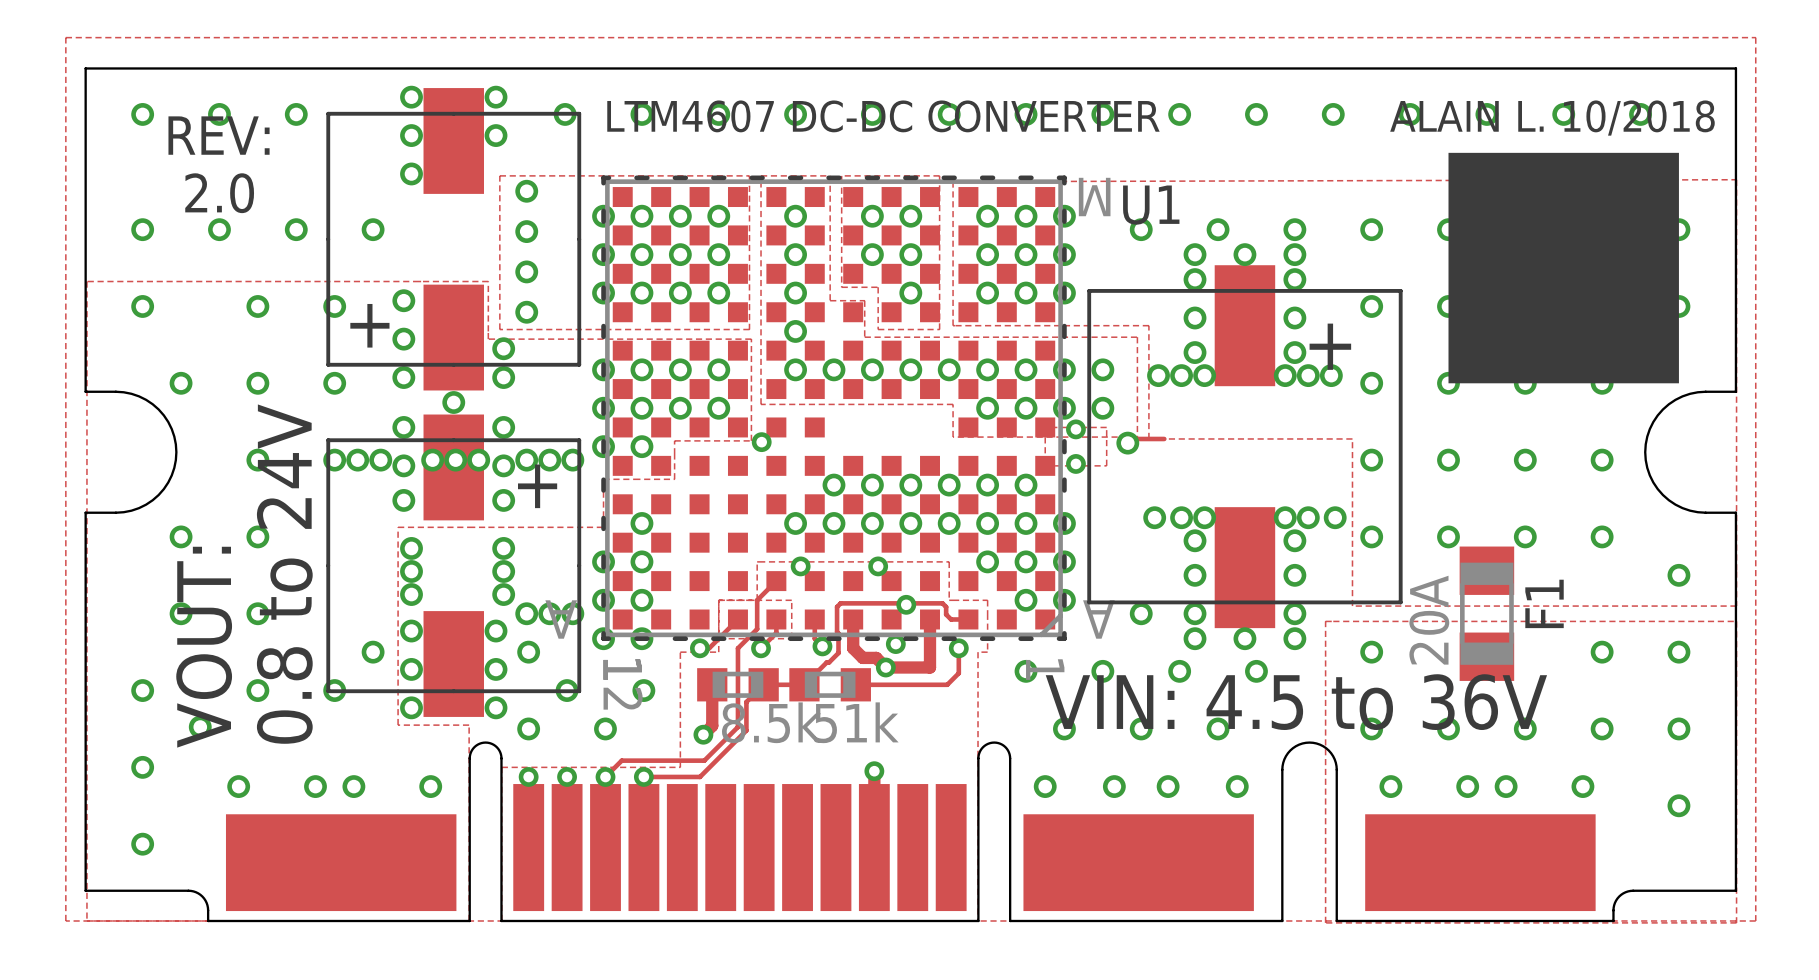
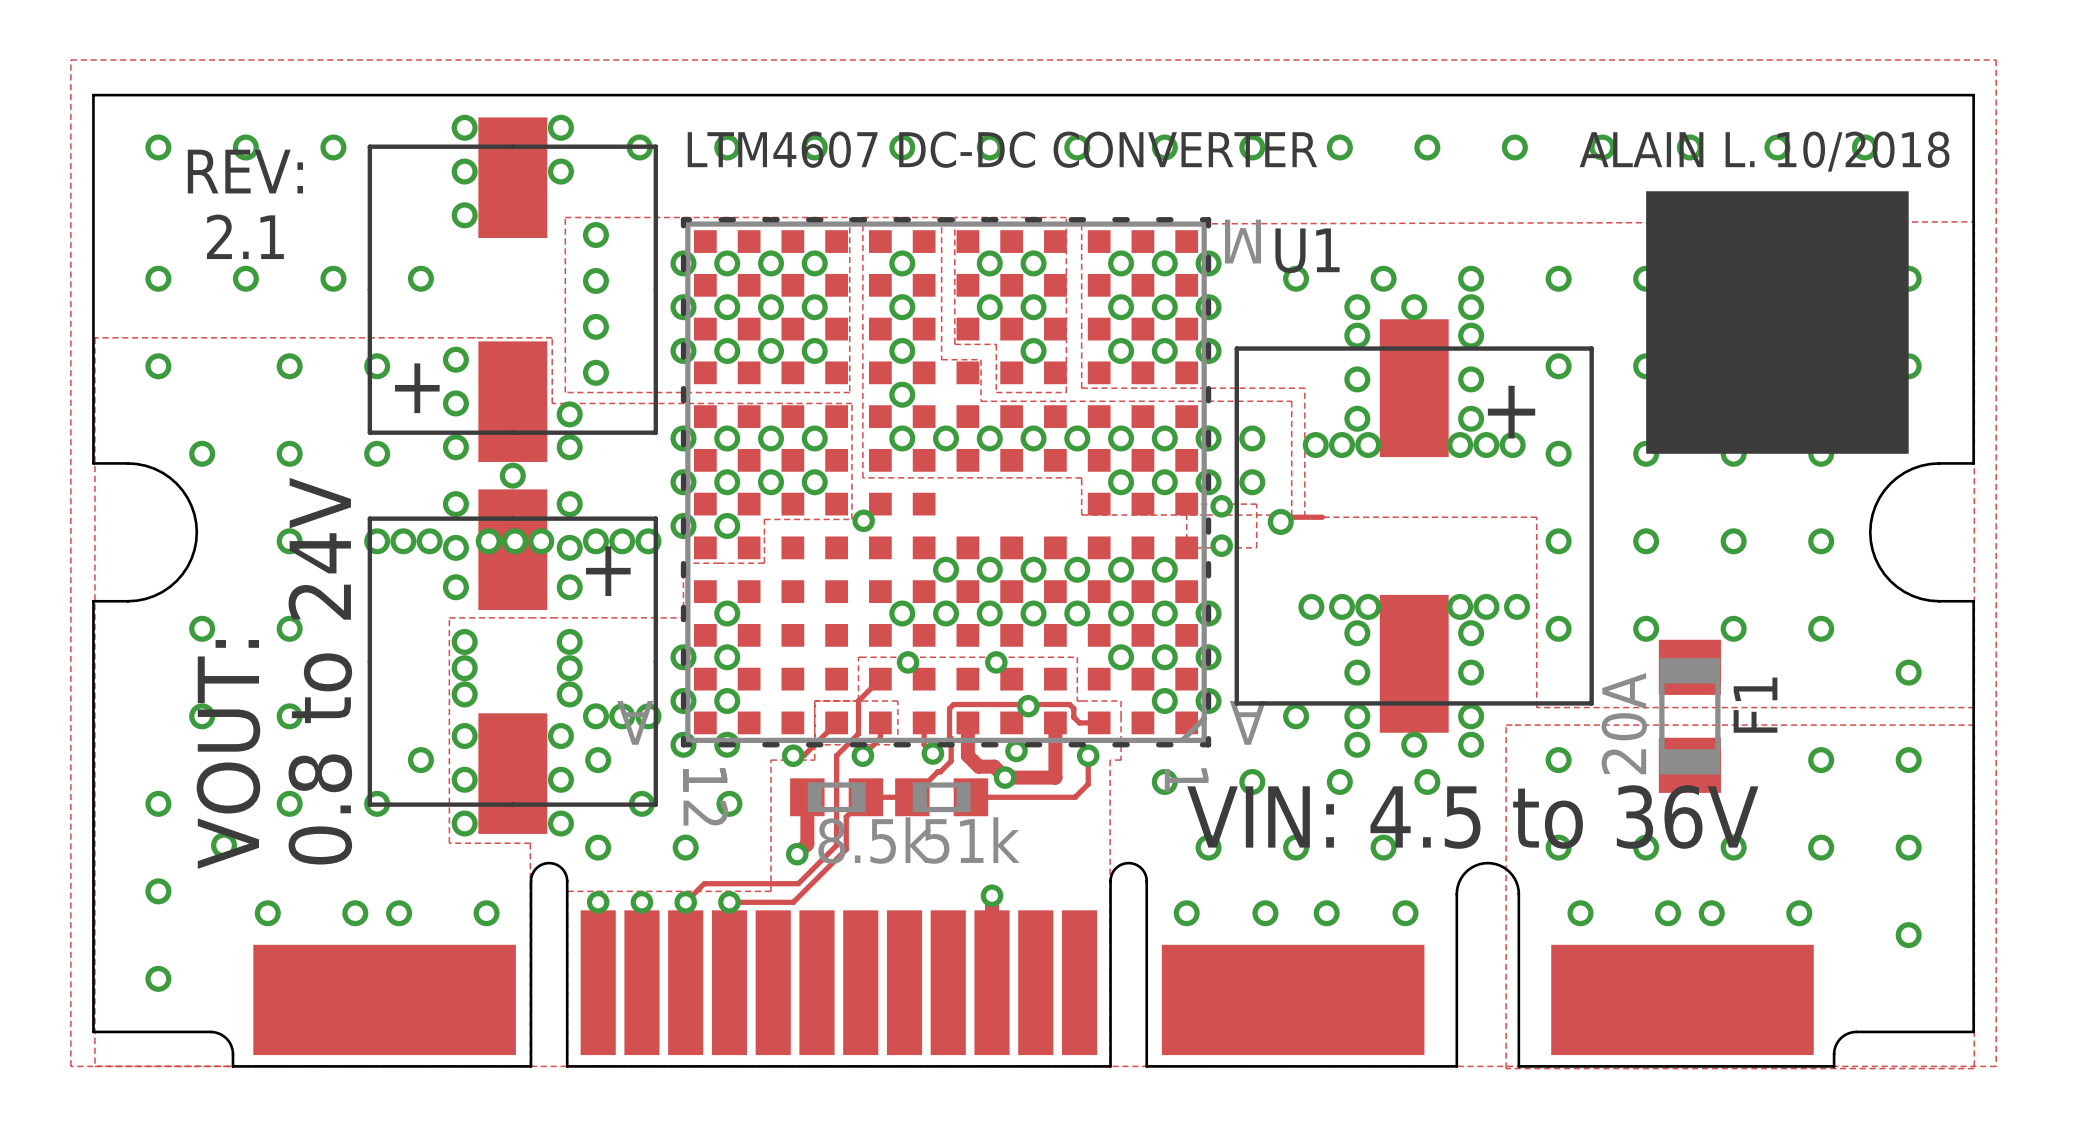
text: 2.0 (219, 193) -> 2.1 (245, 236)

